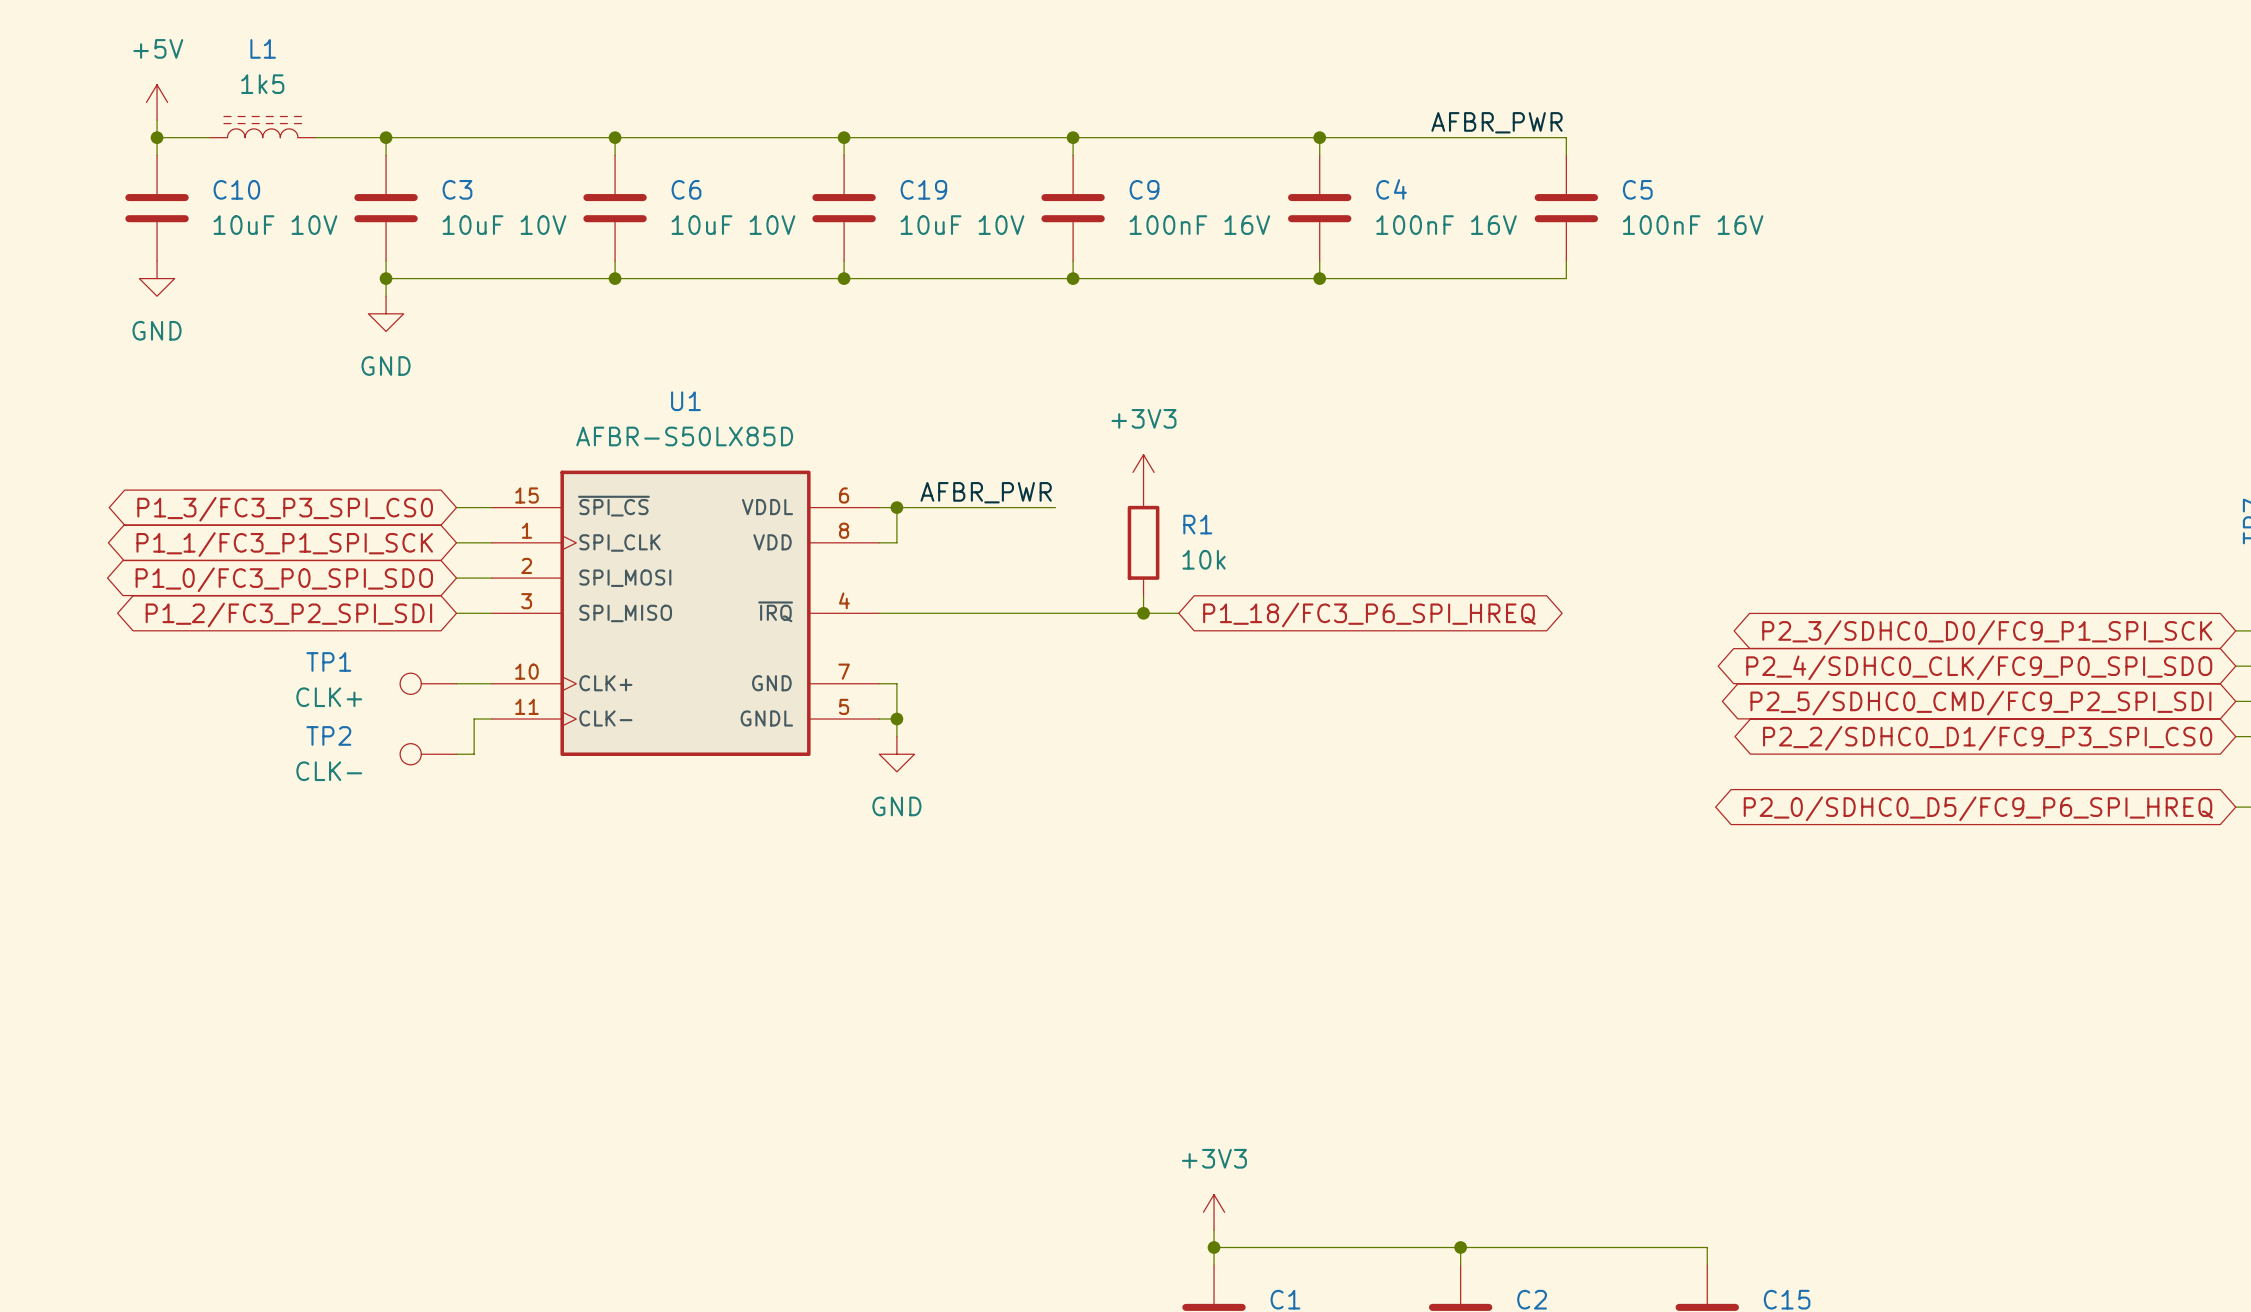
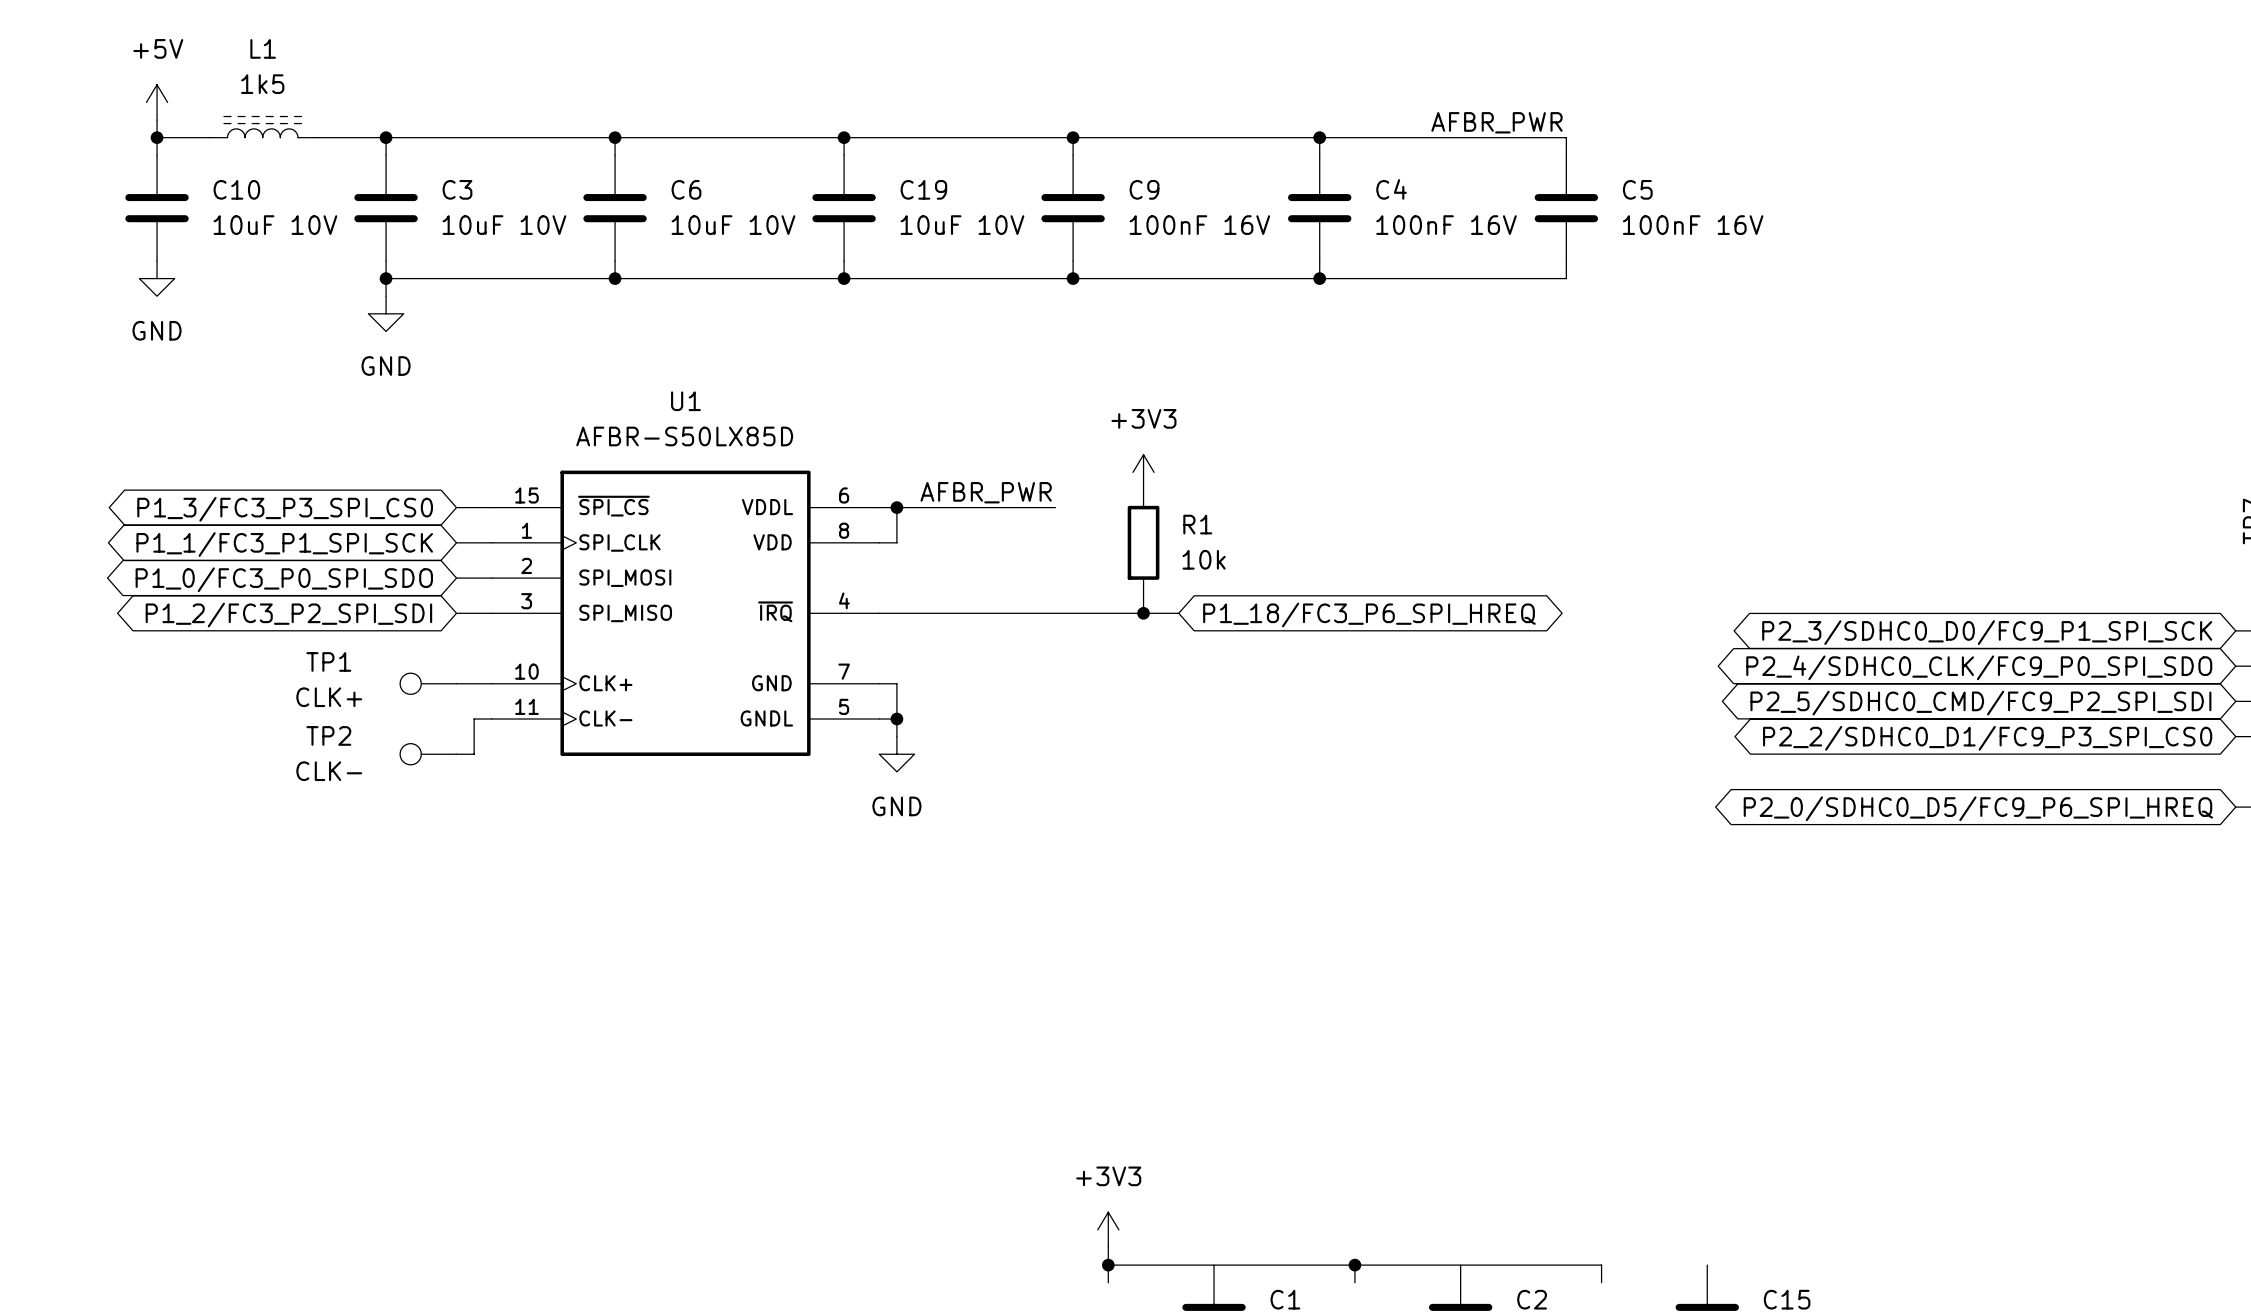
power symbol: +3V3 (1214, 1212) -> none
power symbol: none -> +3V3 (1108, 1229)
wire: (1214, 1229) (1214, 1265) -> (1108, 1247) (1108, 1282)
wire: (1214, 1247) (1707, 1247) (1707, 1265) -> (1108, 1265) (1601, 1265) (1601, 1282)
junction: (1214, 1247) -> none
wire: (1460, 1247) (1460, 1265) -> (1354, 1265) (1354, 1282)
junction: (1460, 1247) -> none
junction: none -> (1108, 1265)
junction: none -> (1354, 1265)

